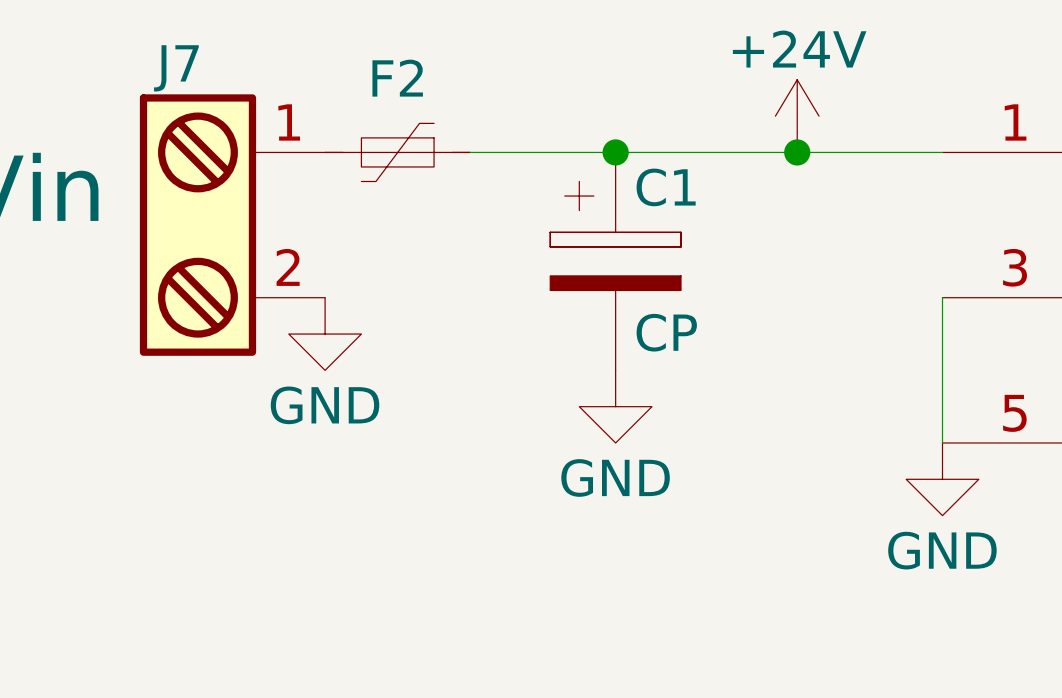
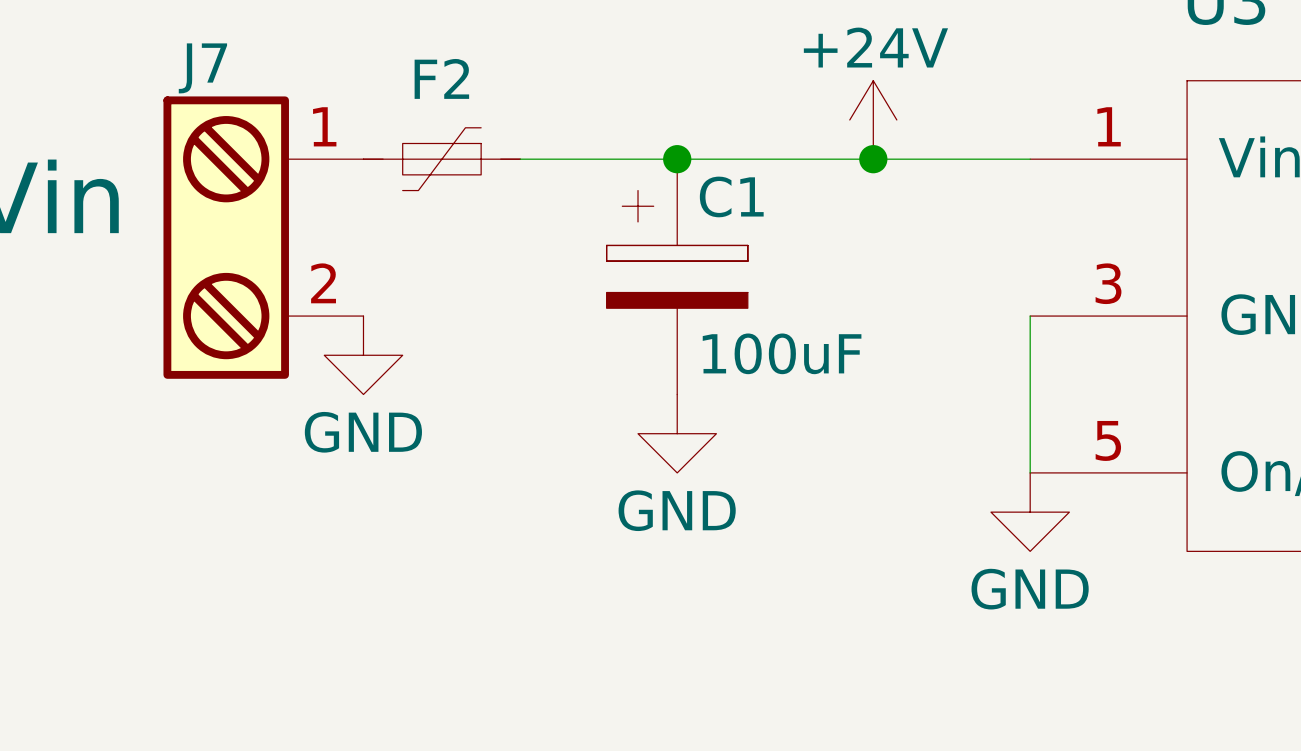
C1 value: CP (666, 332) -> 100uF (782, 353)

